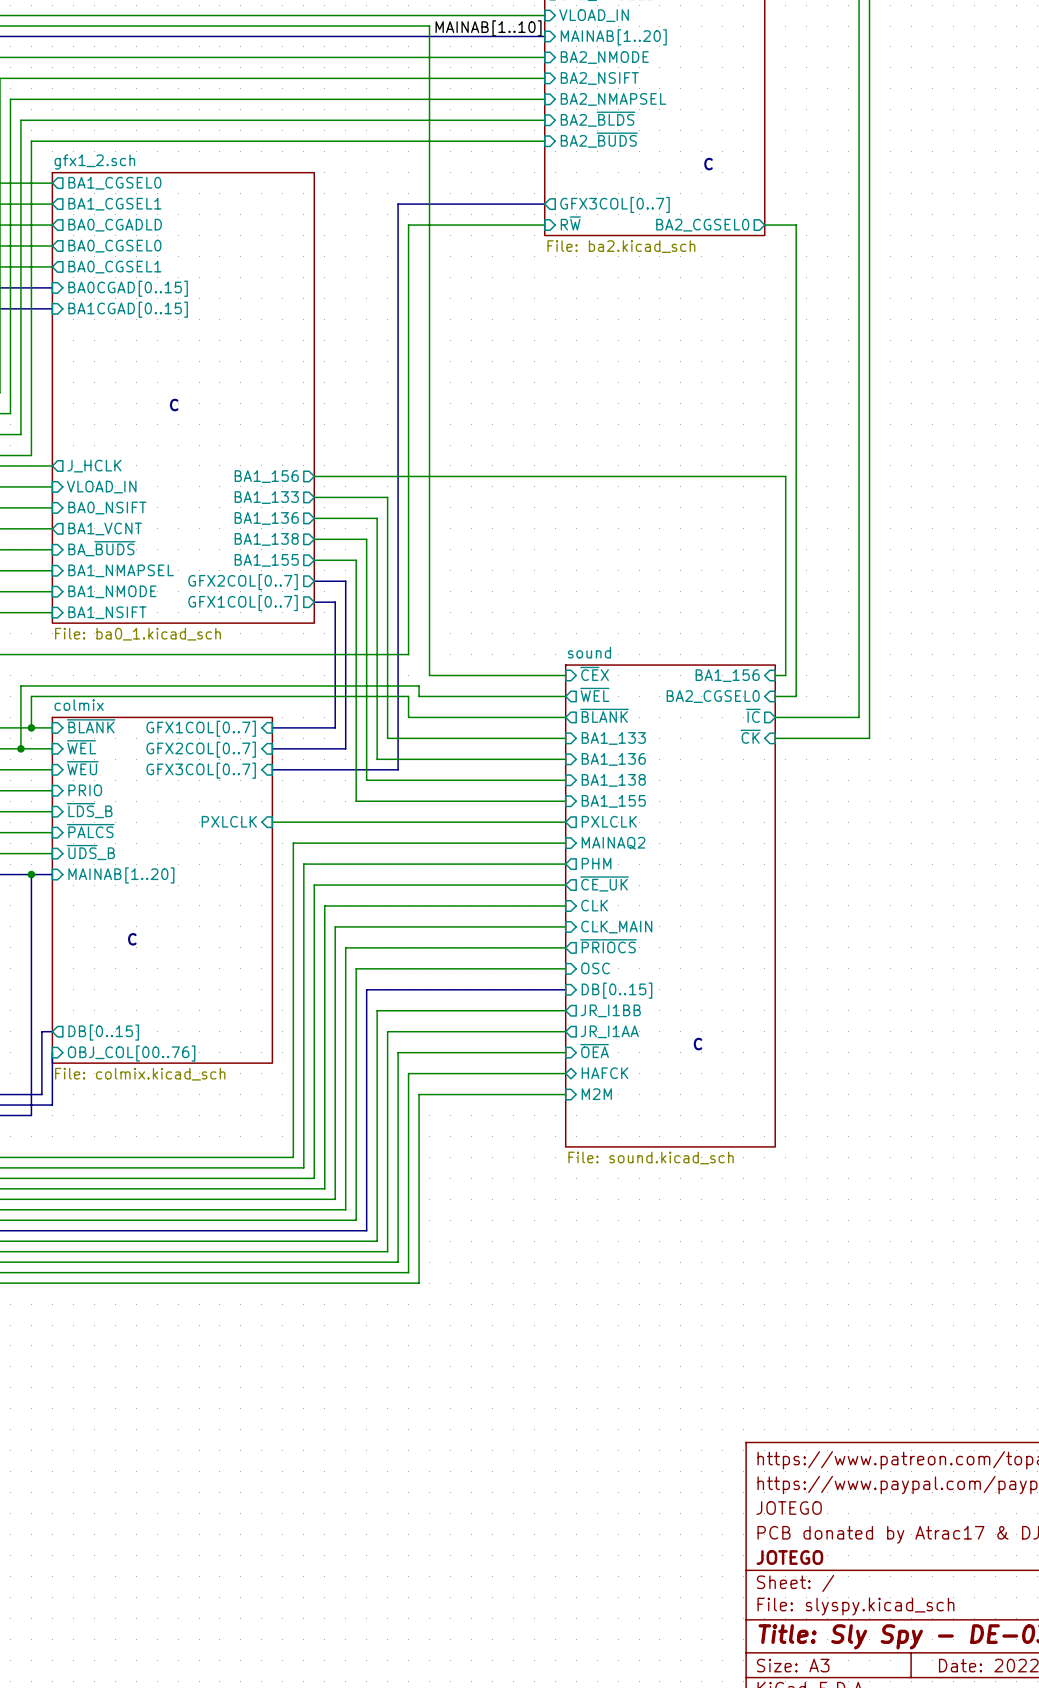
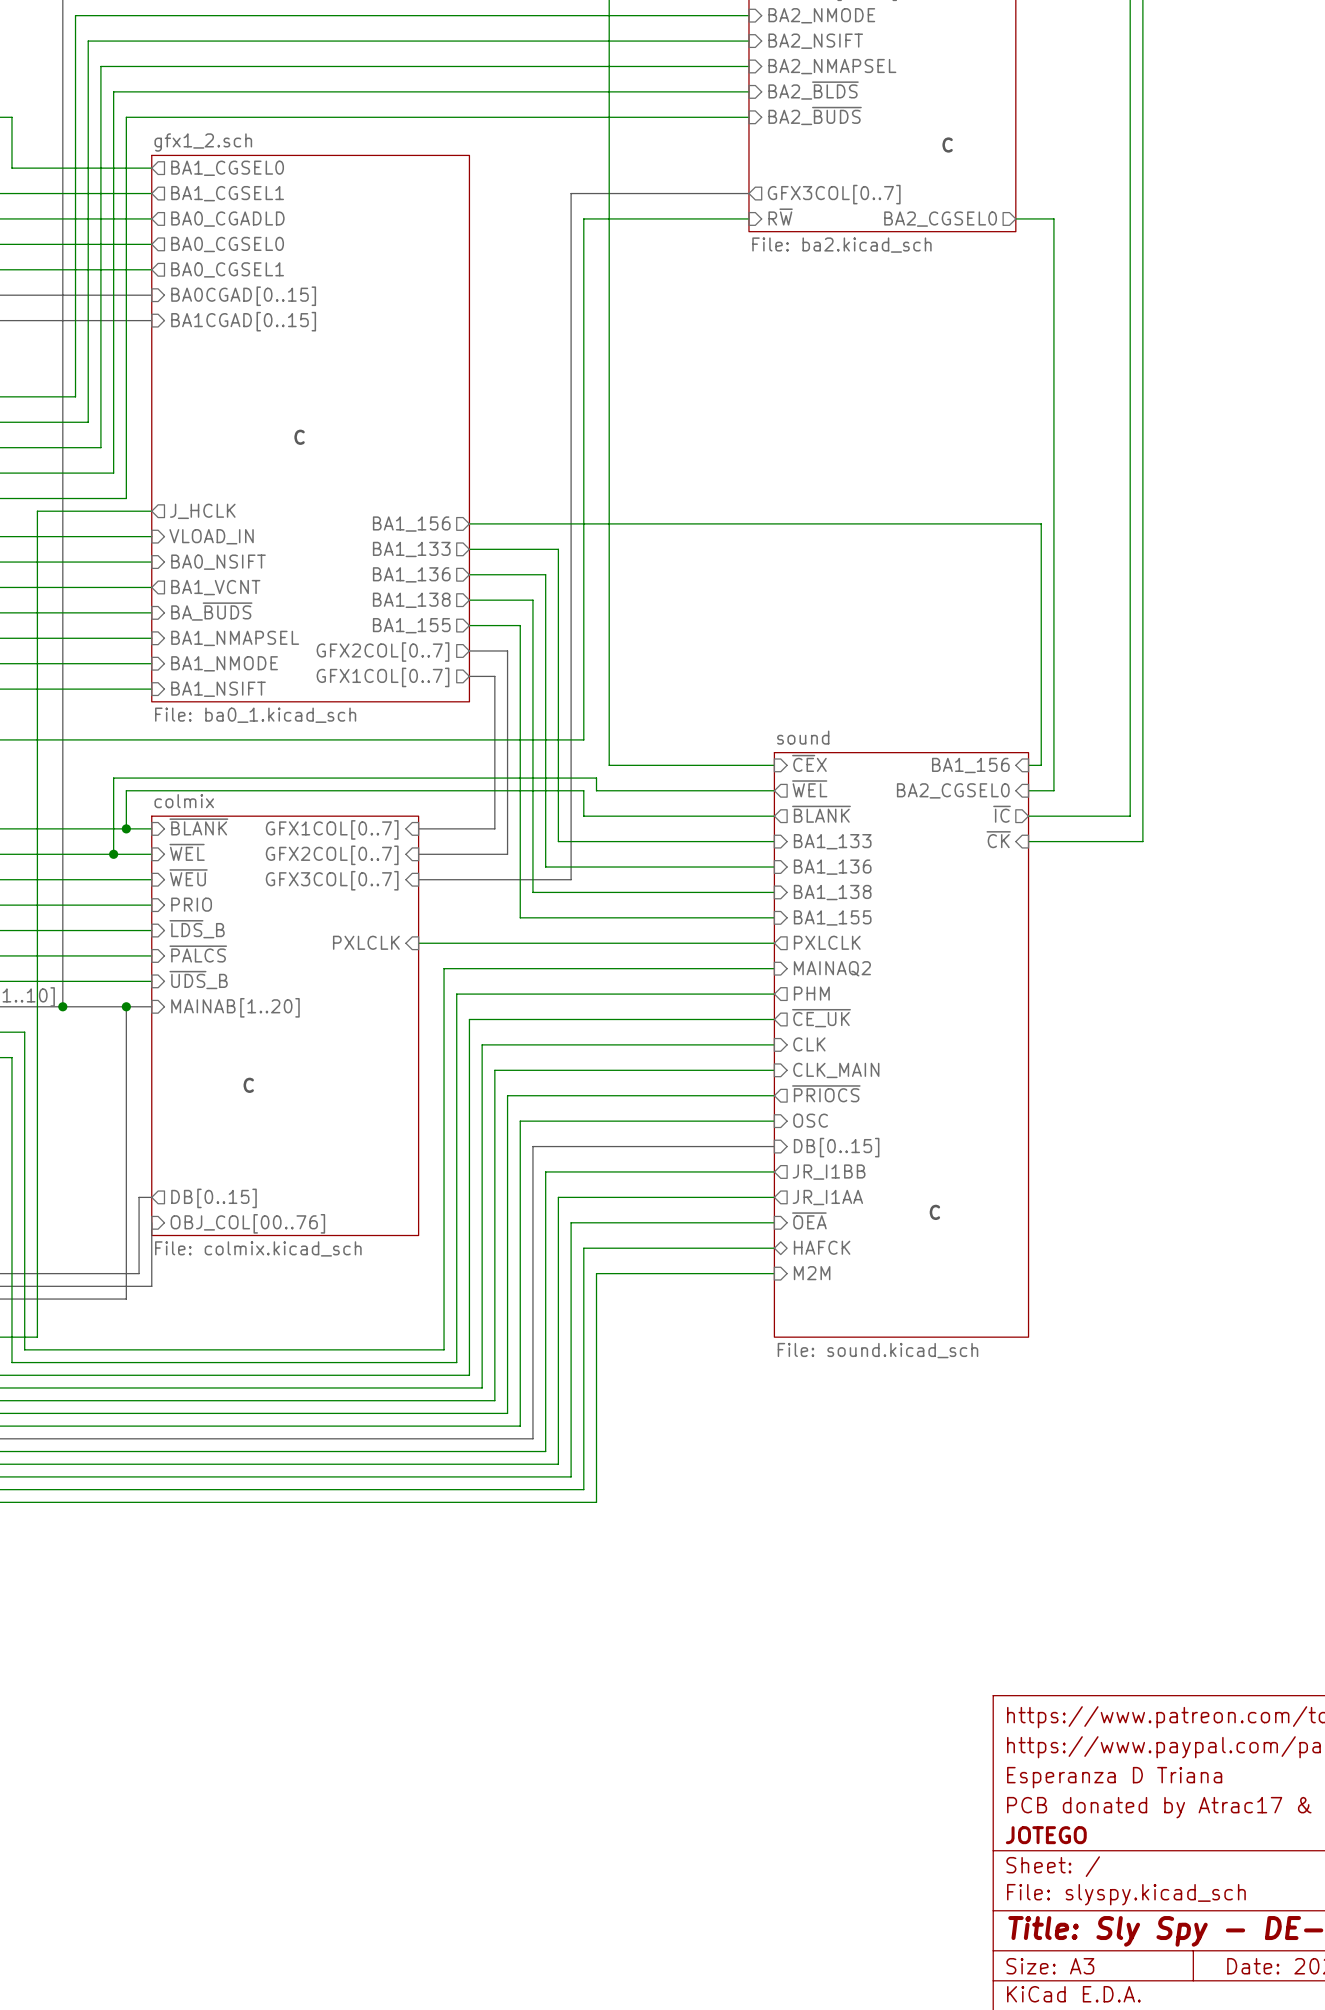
title block: JOTEGO (789, 1508) -> Esperanza D Triana (1114, 1777)

